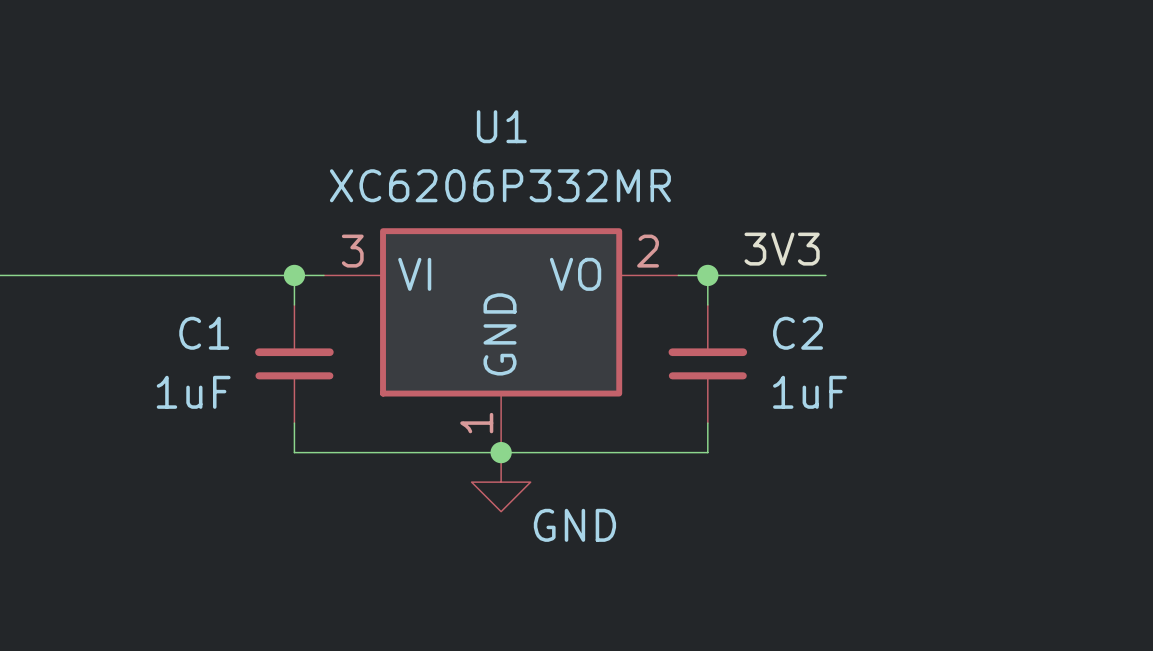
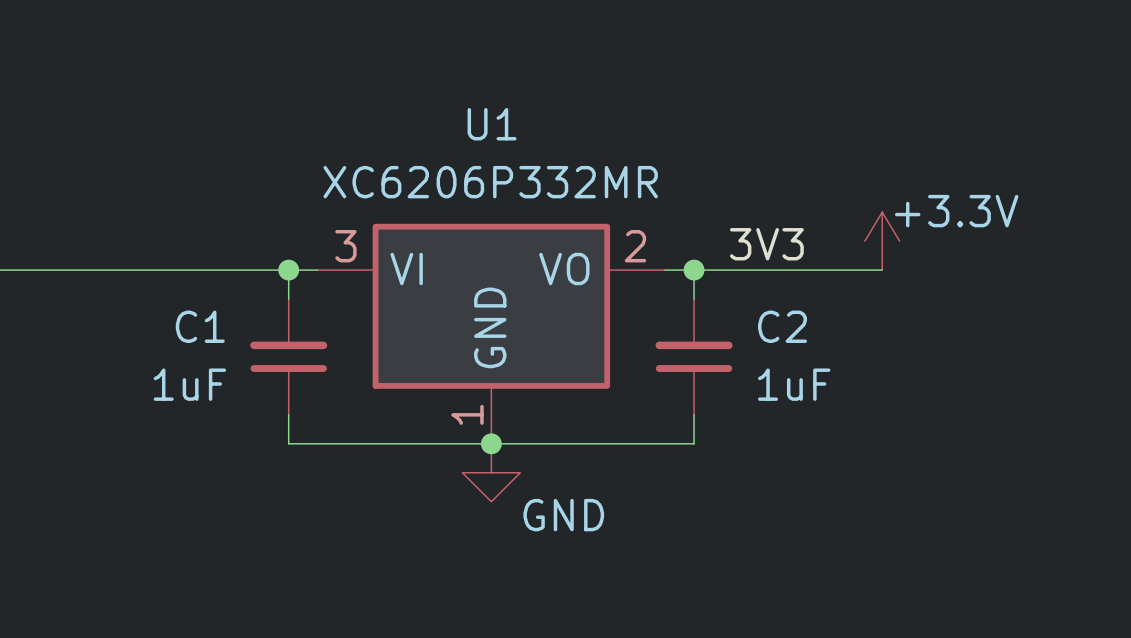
power symbol: none -> +3.3V (882, 241)
wire: none -> (809, 270) (882, 270)

